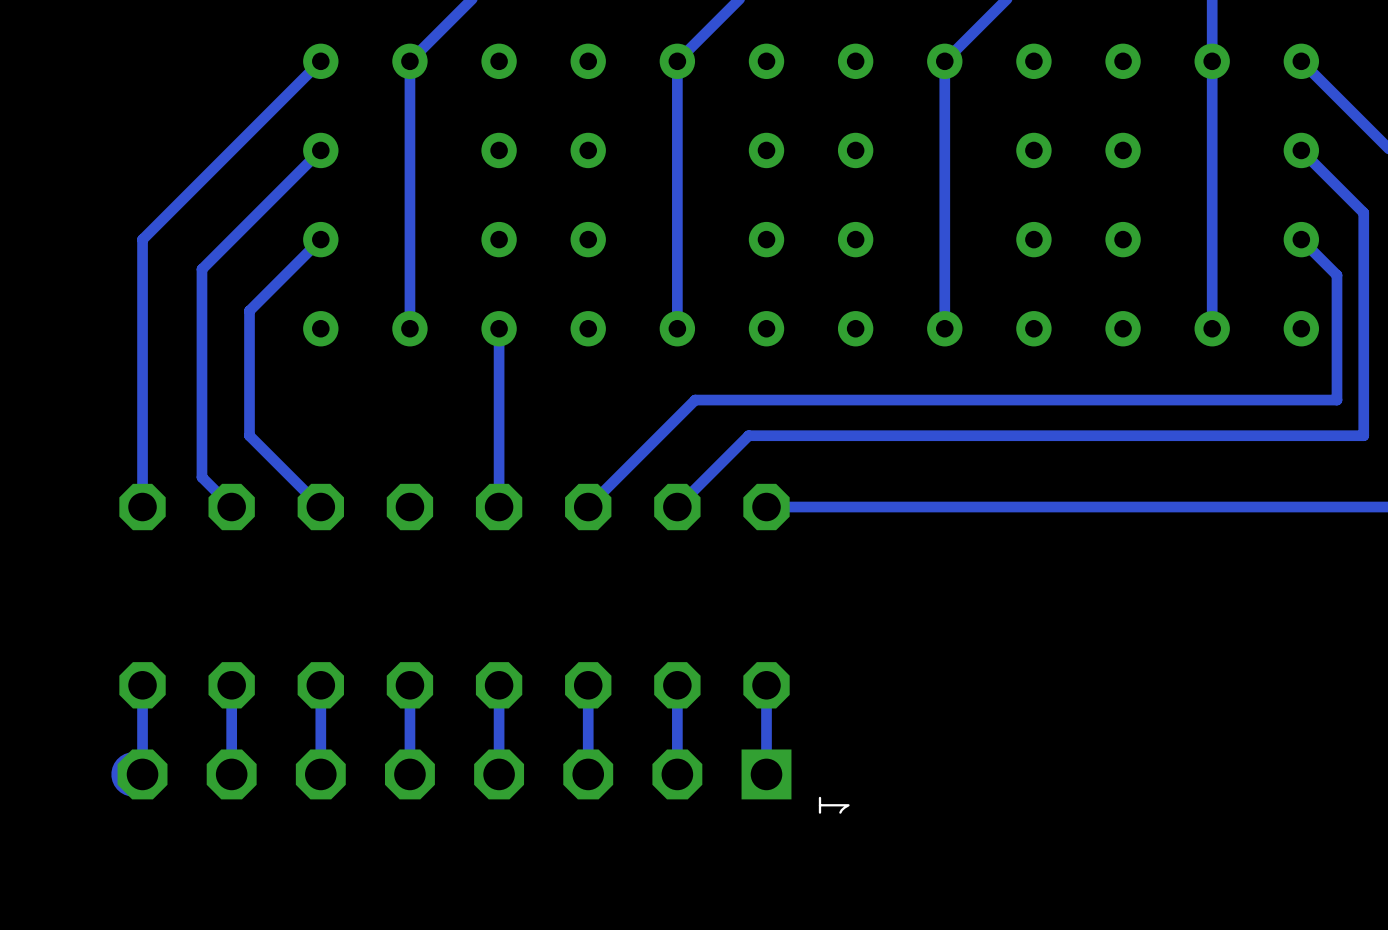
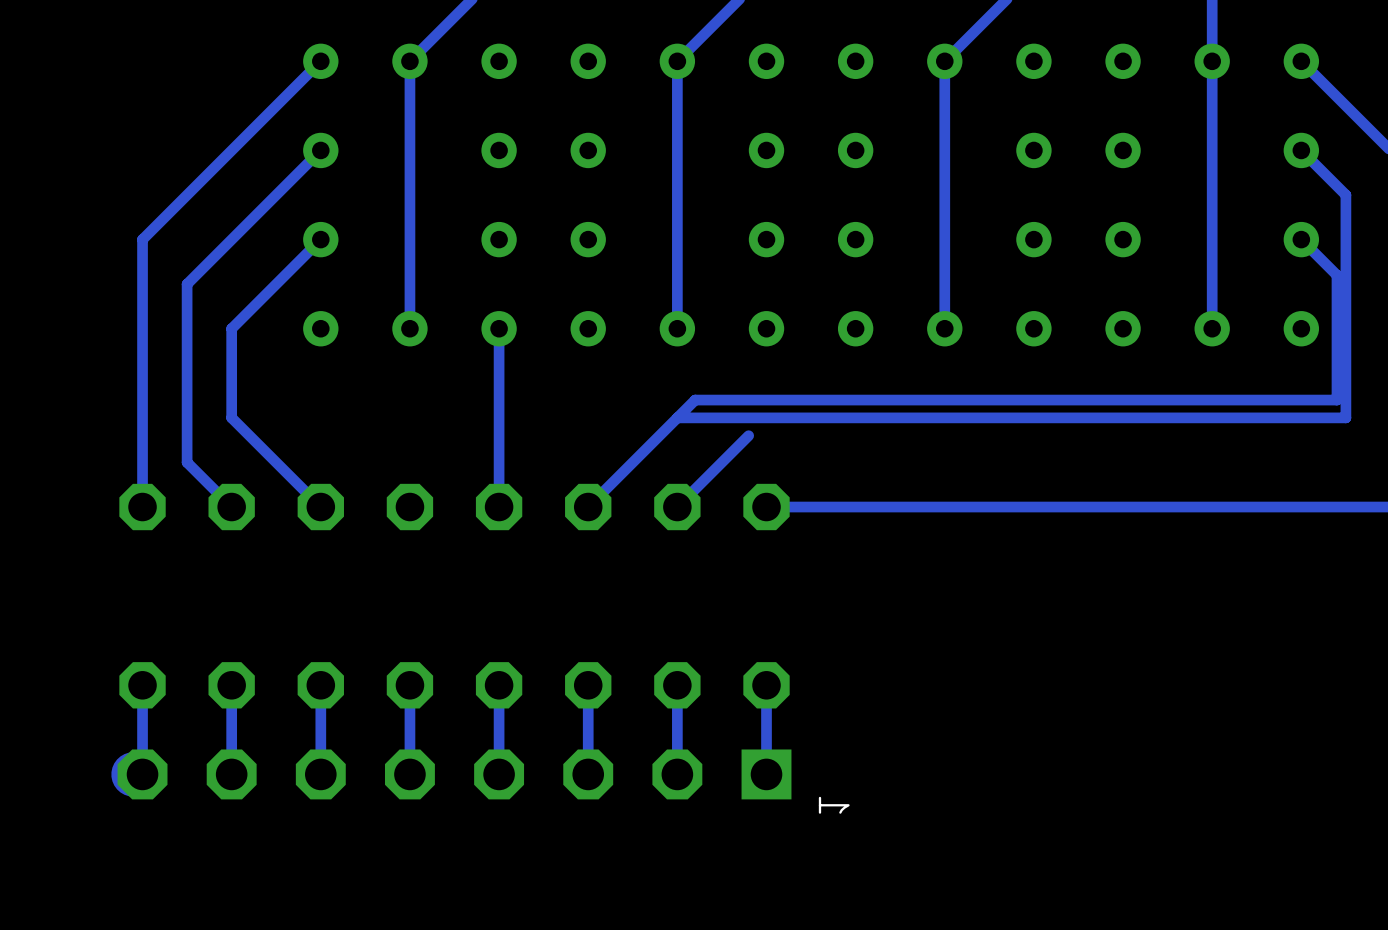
track: (1345, 195) (1363, 212) (1363, 435) (748, 435) -> (1345, 195) (1345, 417) (677, 417)
track: (201, 269) (201, 477) (231, 507) -> (201, 269) (187, 284) (187, 462) (231, 507)
track: (249, 310) (249, 435) -> (249, 310) (231, 328) (231, 417) (249, 435)

